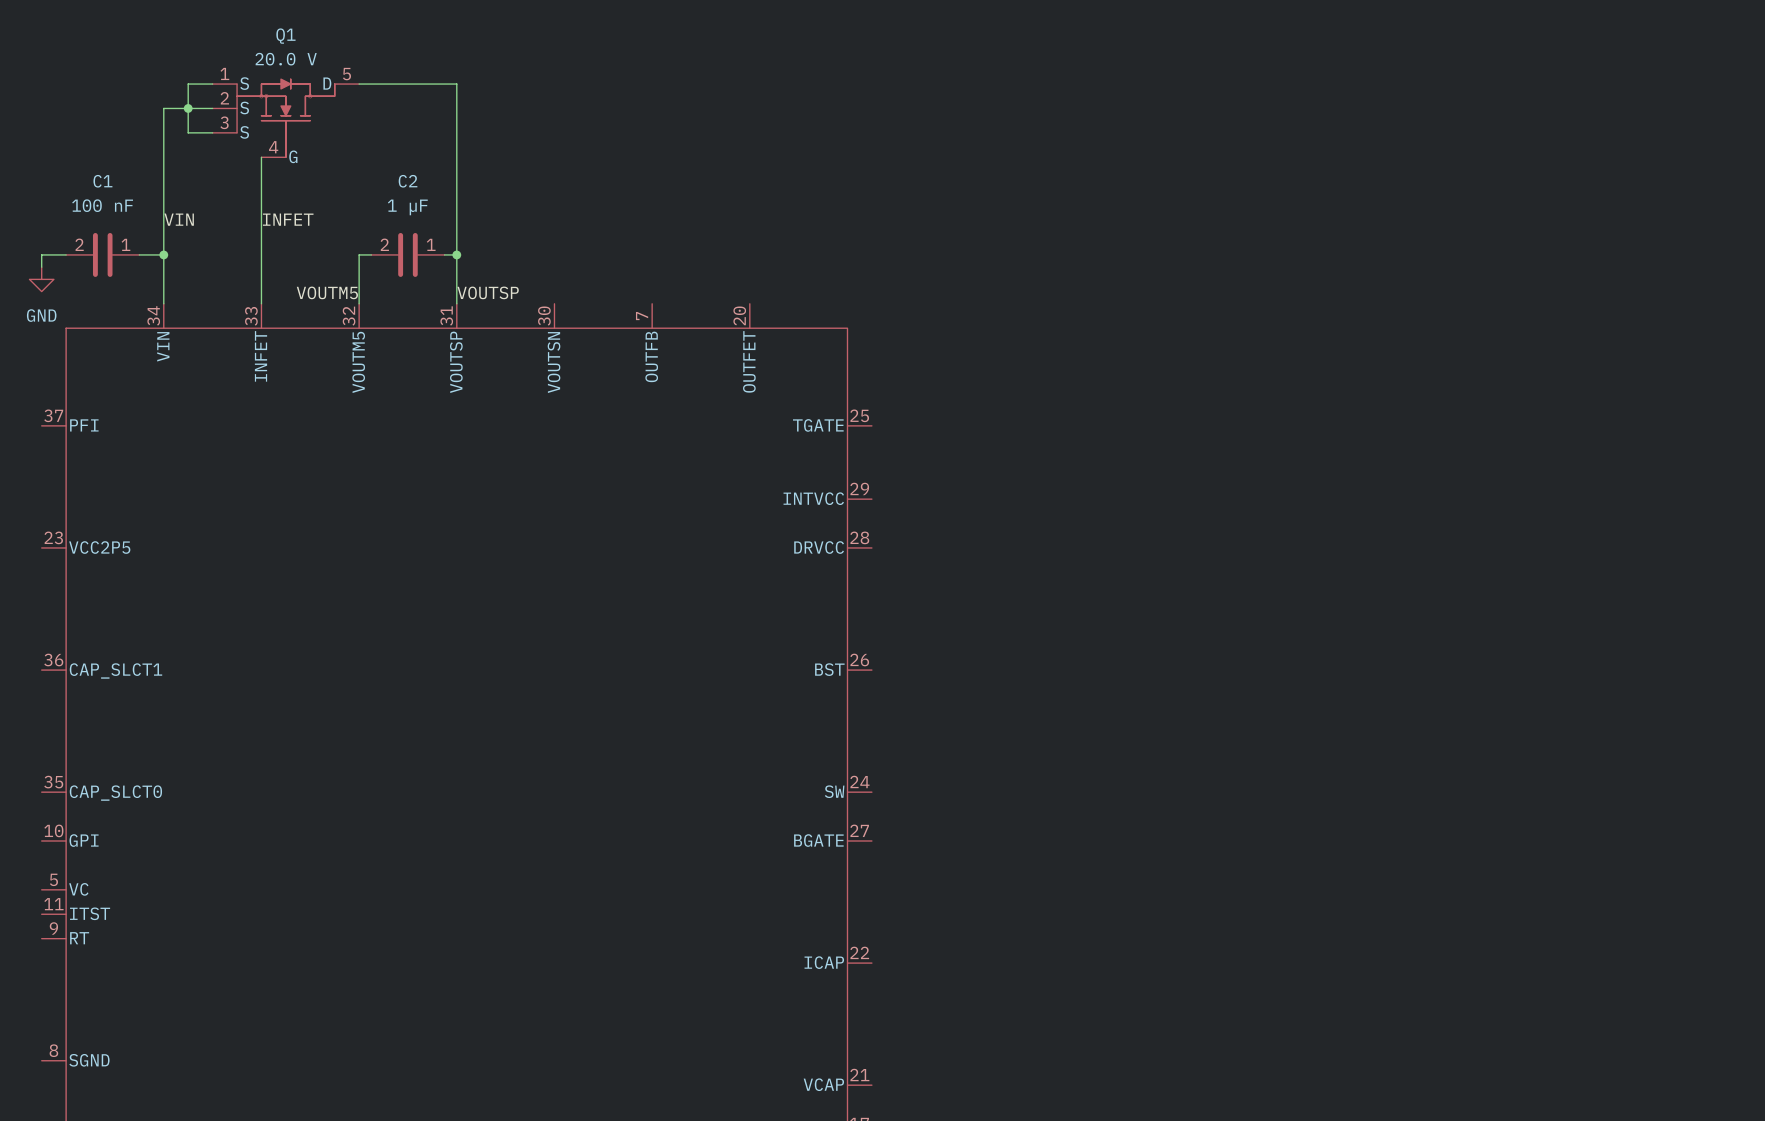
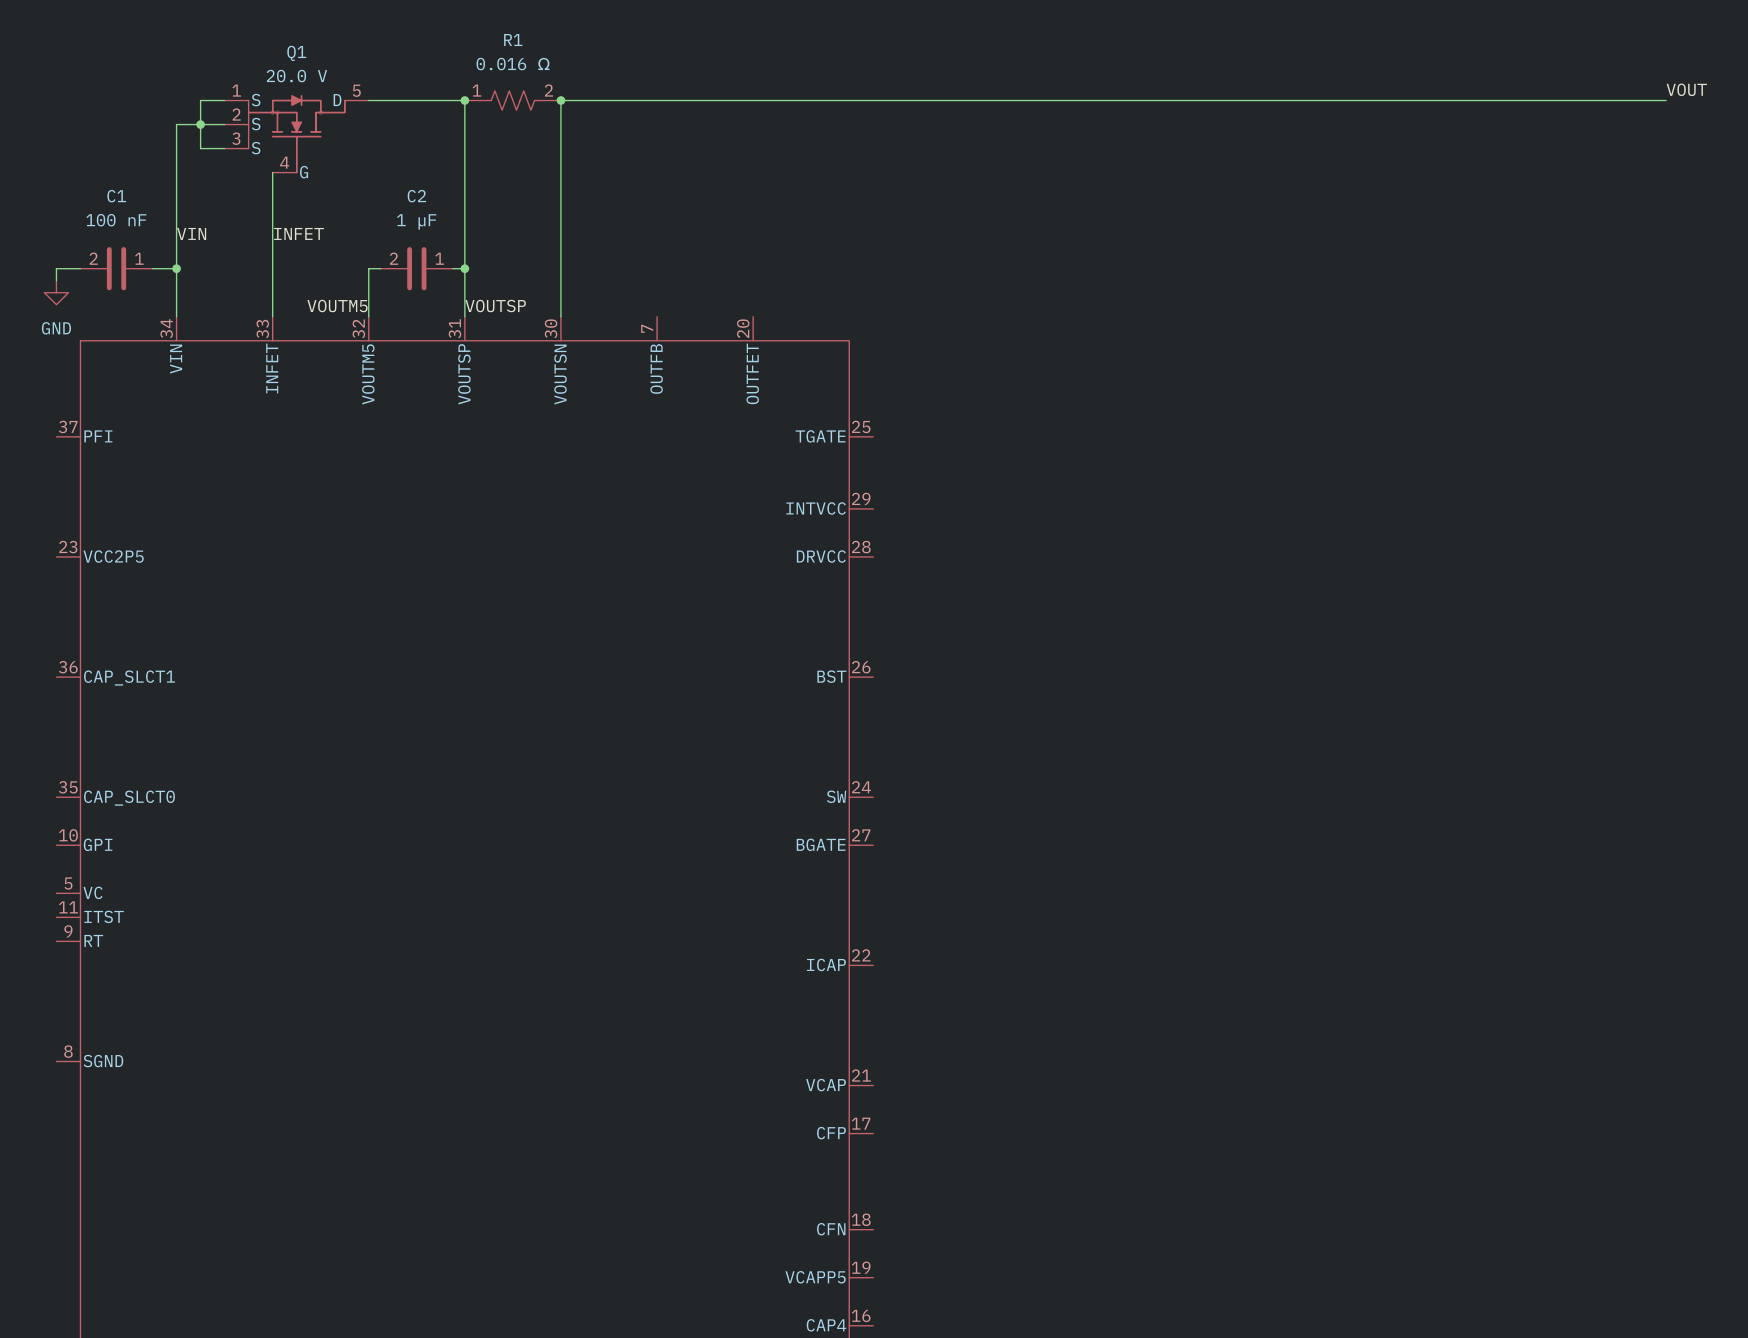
label: none -> VOUT (1686, 89)
junction: none -> (464, 100)
R1: none -> 0.016 Ω (512, 100)
junction: none -> (560, 100)
wire: none -> (1666, 100) (560, 100) (560, 316)

